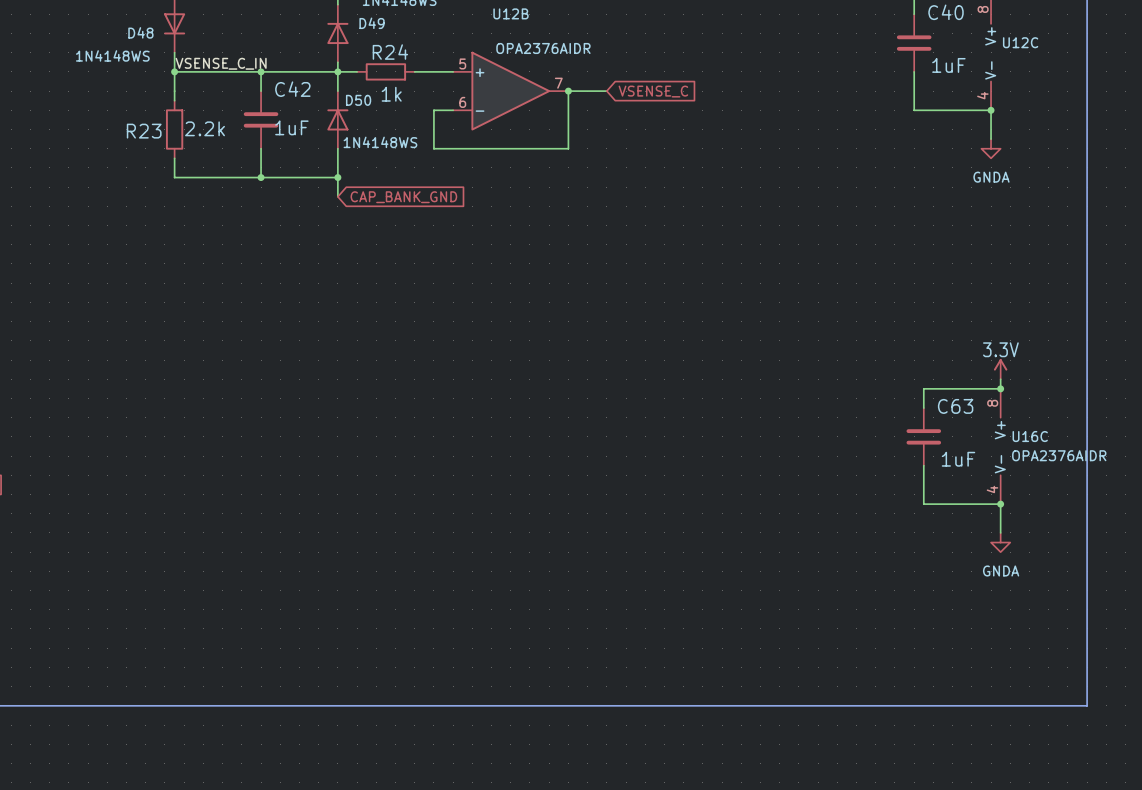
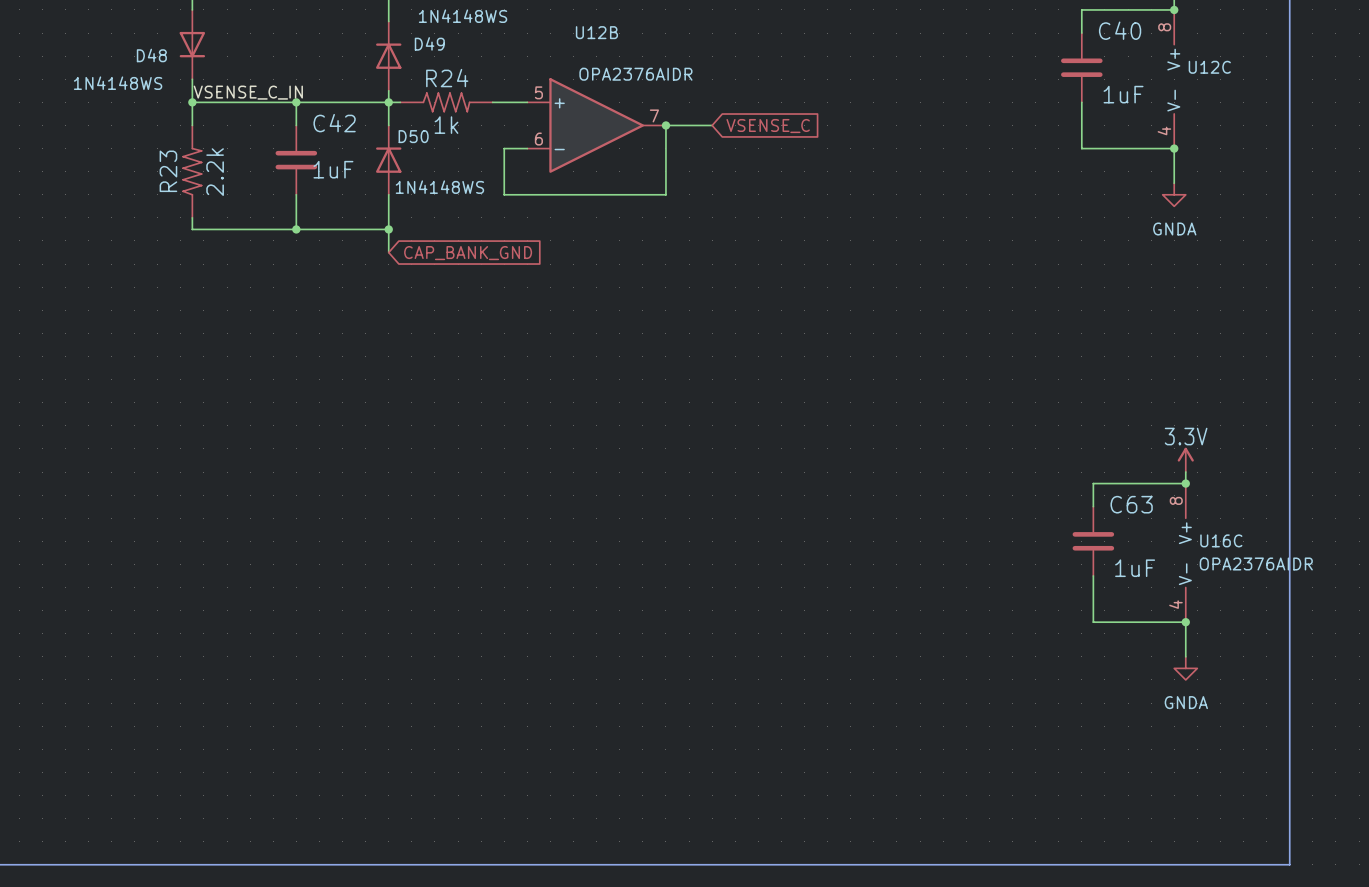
R24 symbol: [357, 63, 415, 81] -> [400, 92, 493, 113]
R23 symbol: [165, 100, 184, 159] -> [182, 125, 203, 218]

